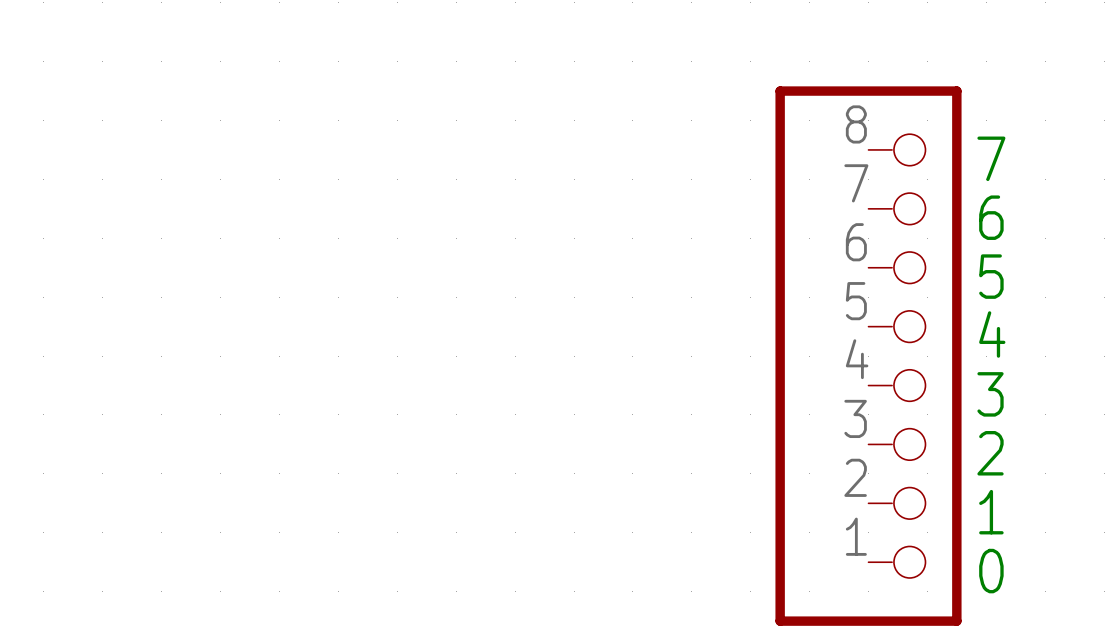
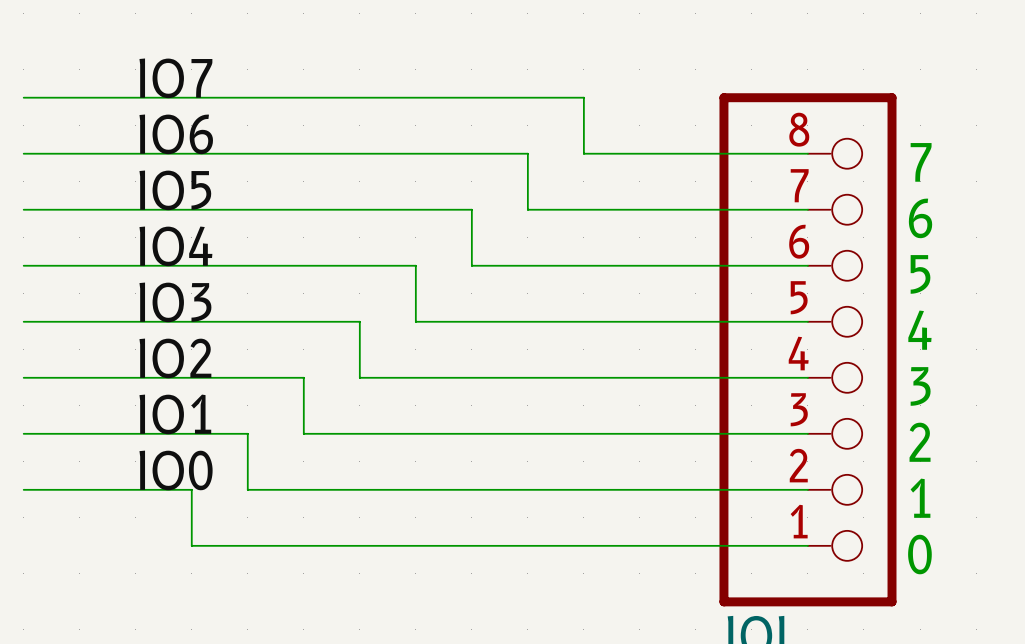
label: none -> IO7 (175, 78)
wire: none -> (23, 97) (583, 97) (583, 153) (807, 153)
label: none -> IO6 (176, 134)
wire: none -> (23, 153) (527, 153) (527, 209) (807, 209)
label: none -> IO5 (175, 190)
wire: none -> (23, 209) (471, 209) (471, 265) (807, 265)
label: none -> IO4 (175, 246)
wire: none -> (23, 265) (415, 265) (415, 321) (807, 321)
label: none -> IO3 (175, 302)
wire: none -> (23, 321) (359, 321) (359, 377) (807, 377)
label: none -> IO2 (175, 358)
wire: none -> (23, 377) (303, 377) (303, 433) (807, 433)
label: none -> IO1 (175, 414)
wire: none -> (23, 433) (247, 433) (247, 489) (807, 489)
label: none -> IO0 (176, 470)
wire: none -> (23, 489) (191, 489) (191, 545) (807, 545)

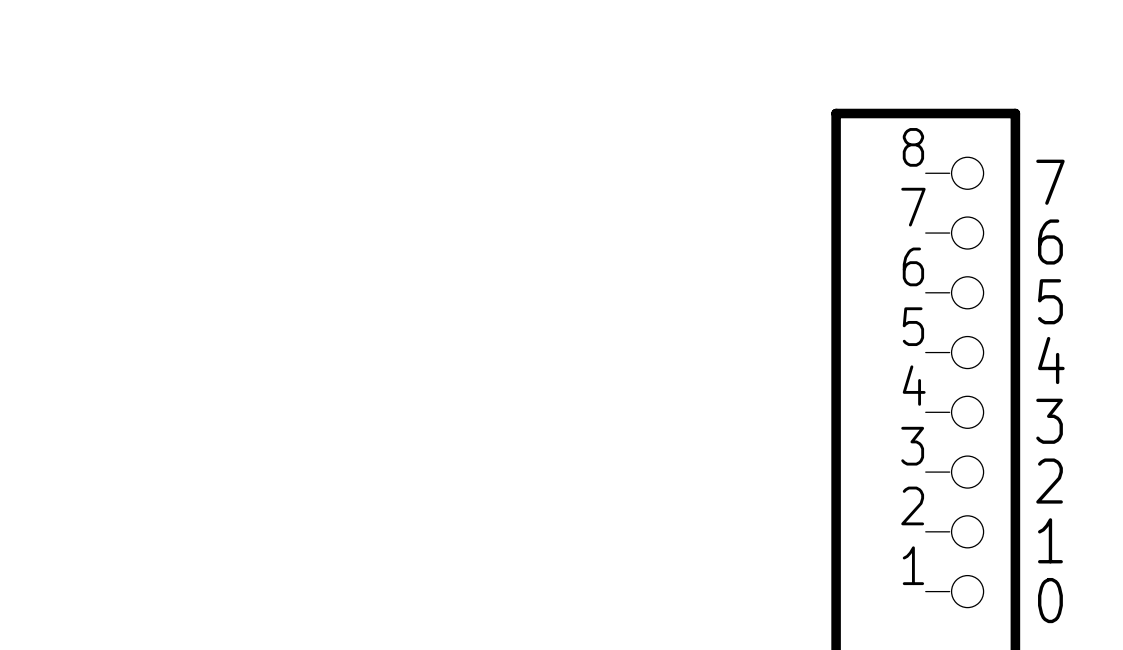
label: IO7 (175, 78) -> none
wire: (23, 97) (583, 97) (583, 153) (807, 153) -> none
label: IO6 (176, 134) -> none
wire: (23, 153) (527, 153) (527, 209) (807, 209) -> none
label: IO5 (175, 190) -> none
wire: (23, 209) (471, 209) (471, 265) (807, 265) -> none
label: IO4 (175, 246) -> none
wire: (23, 265) (415, 265) (415, 321) (807, 321) -> none
label: IO3 (175, 302) -> none
wire: (23, 321) (359, 321) (359, 377) (807, 377) -> none
label: IO2 (175, 358) -> none
wire: (23, 377) (303, 377) (303, 433) (807, 433) -> none
label: IO1 (175, 414) -> none
wire: (23, 433) (247, 433) (247, 489) (807, 489) -> none
label: IO0 (176, 470) -> none
wire: (23, 489) (191, 489) (191, 545) (807, 545) -> none

